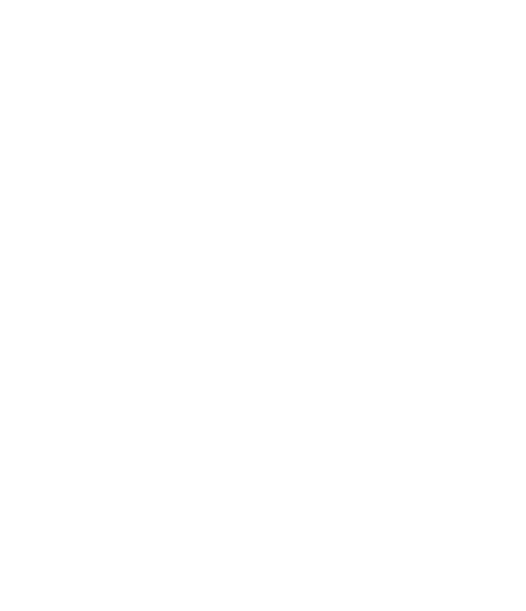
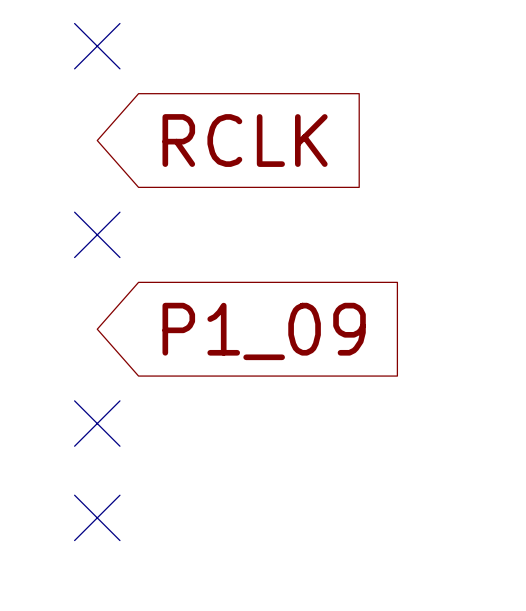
no-connect mark: none -> (97, 46)
global label: none -> RCLK (245, 140)
no-connect mark: none -> (97, 234)
global label: none -> P1_09 (264, 331)
no-connect mark: none -> (97, 423)
no-connect mark: none -> (97, 517)

